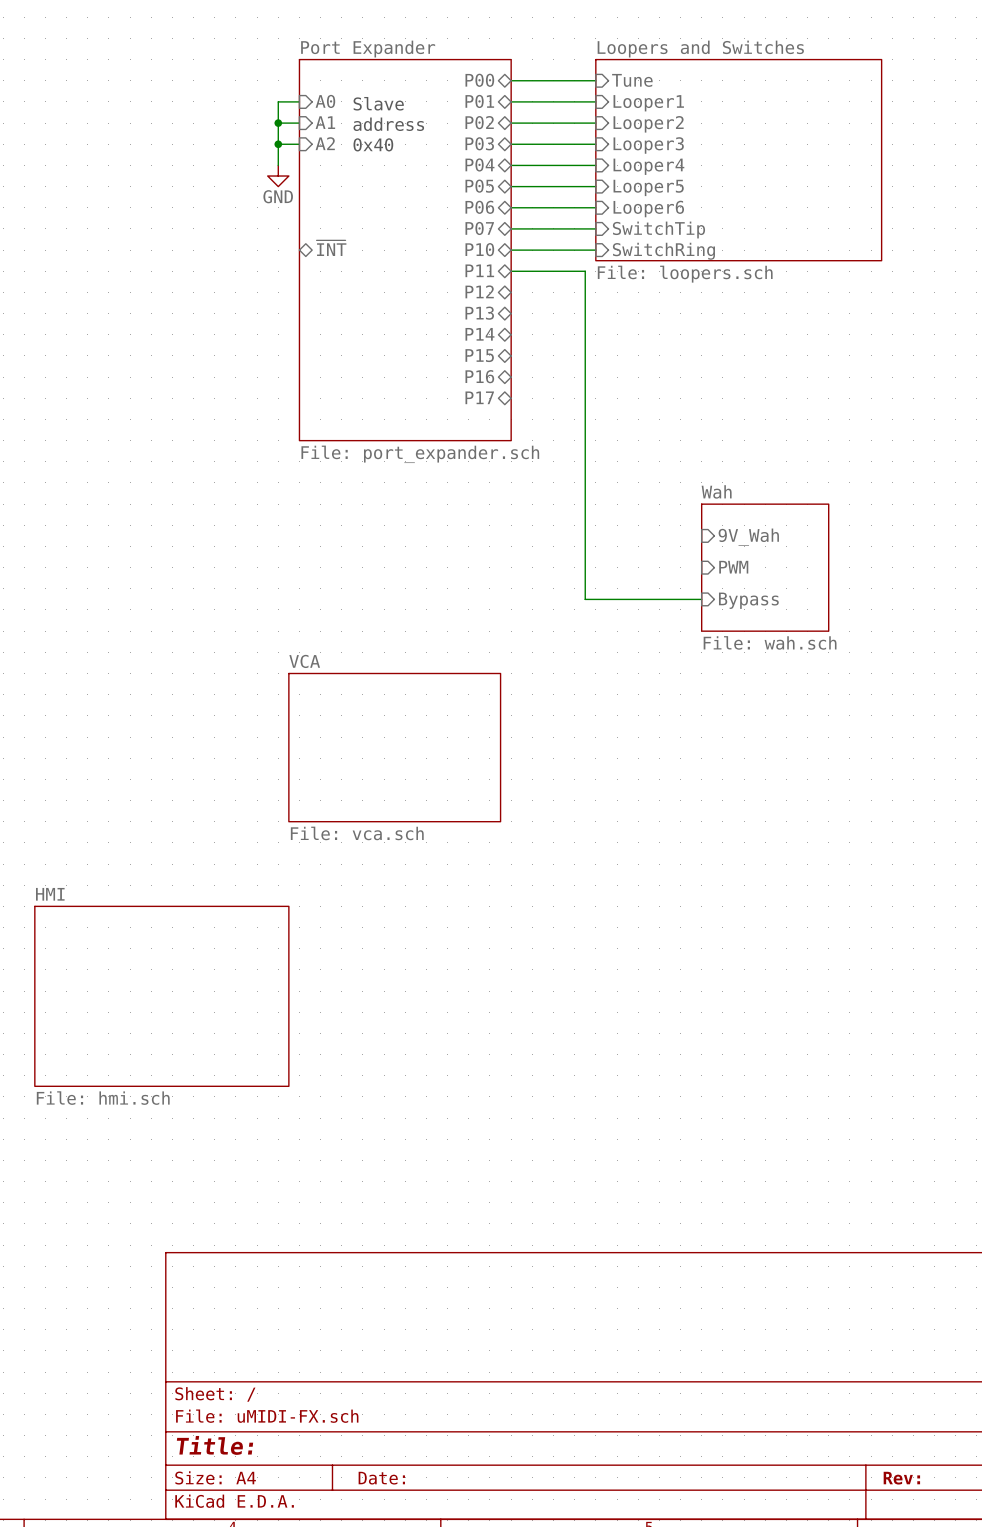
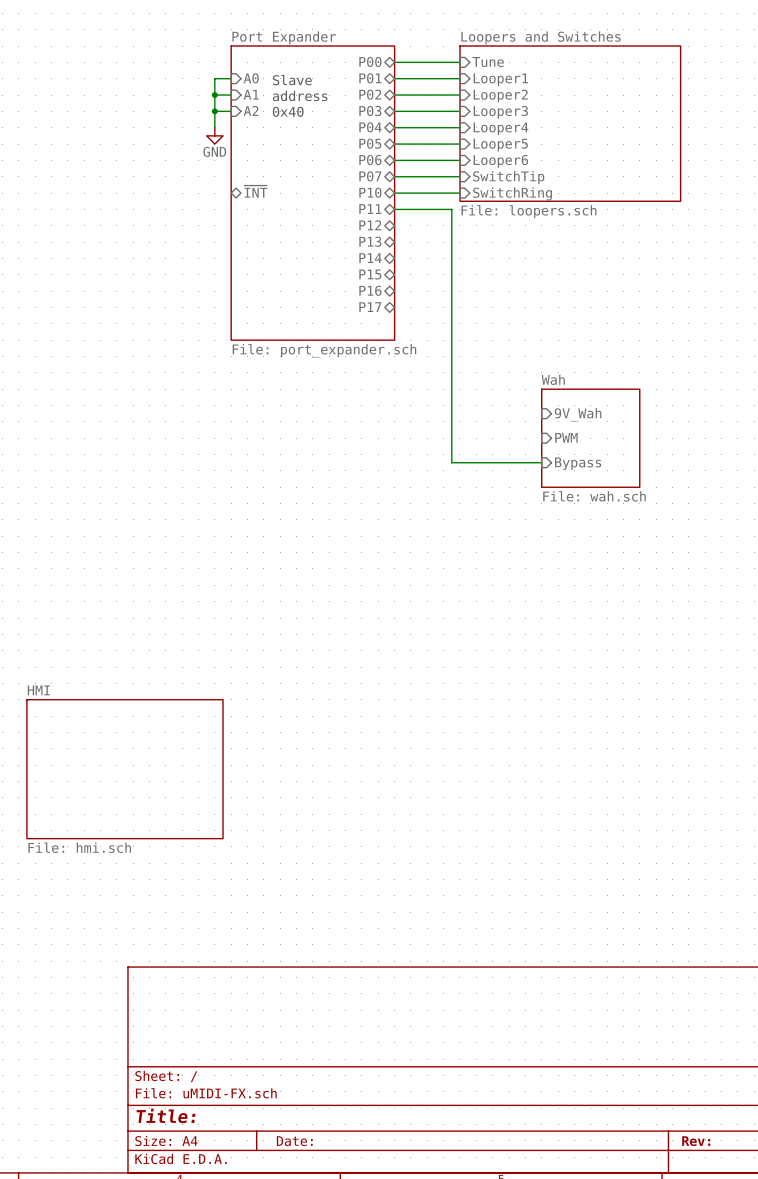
sheet VCA: File: vca.sch (394, 747) -> none

